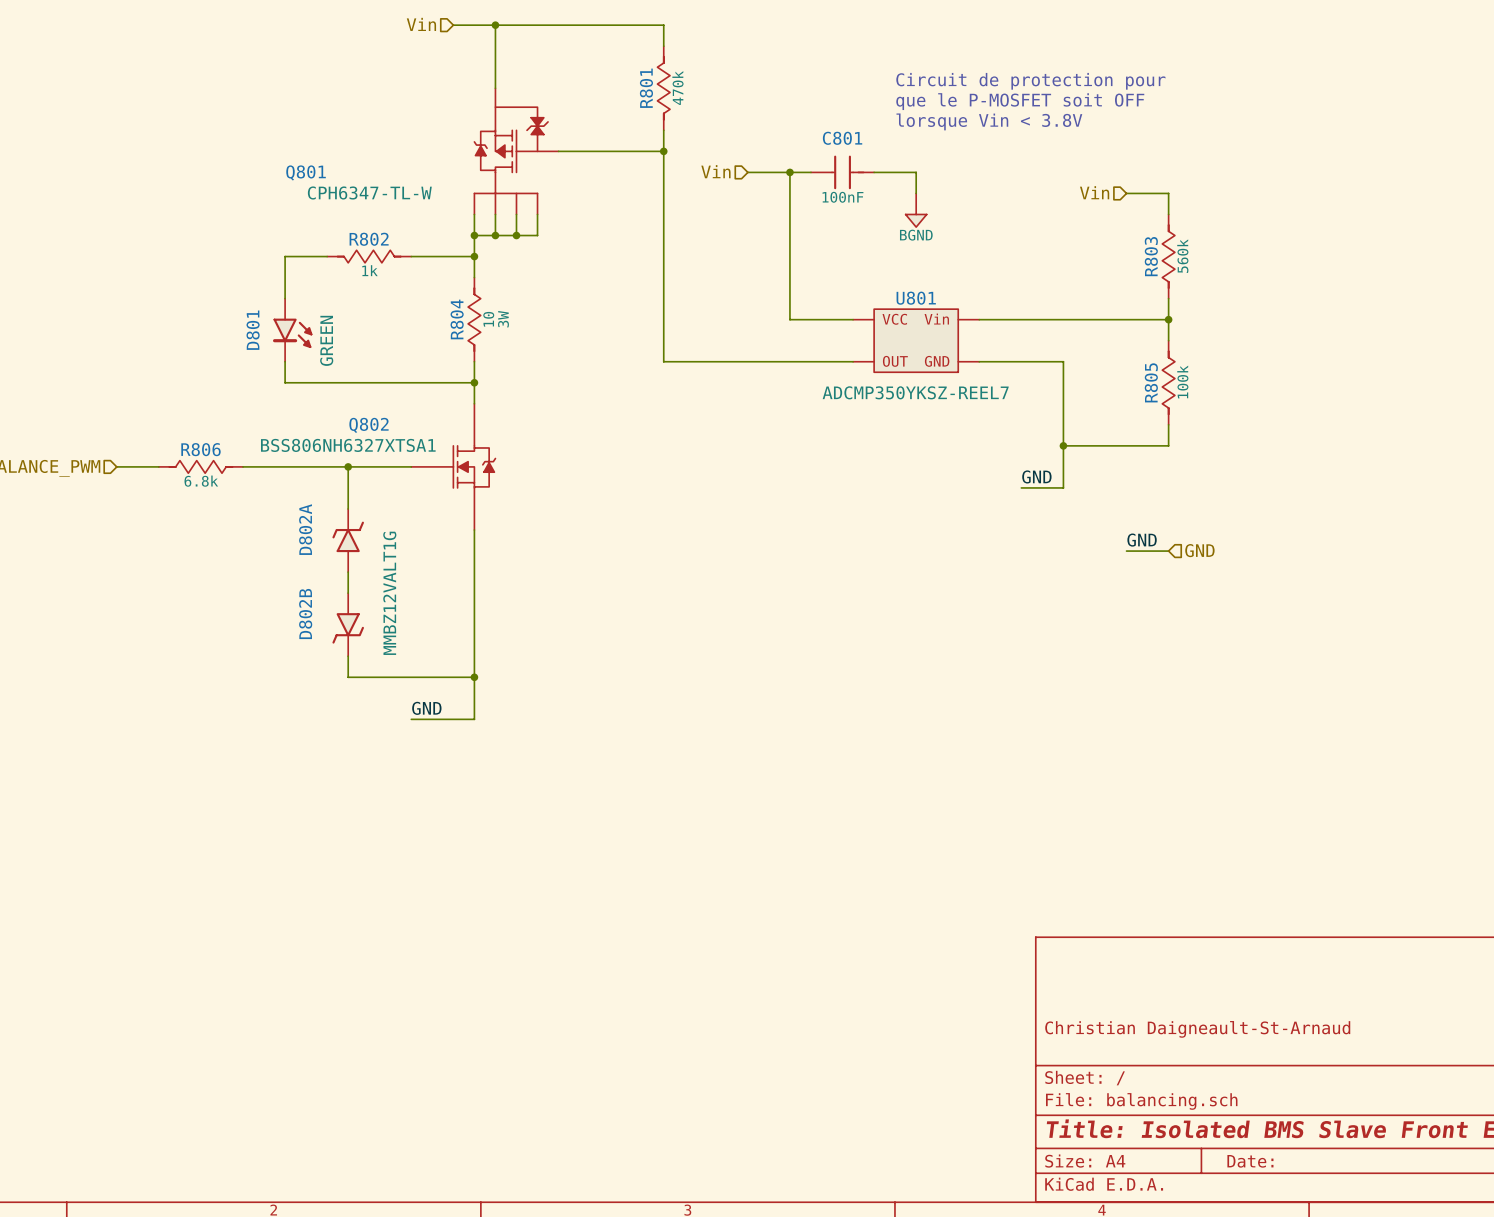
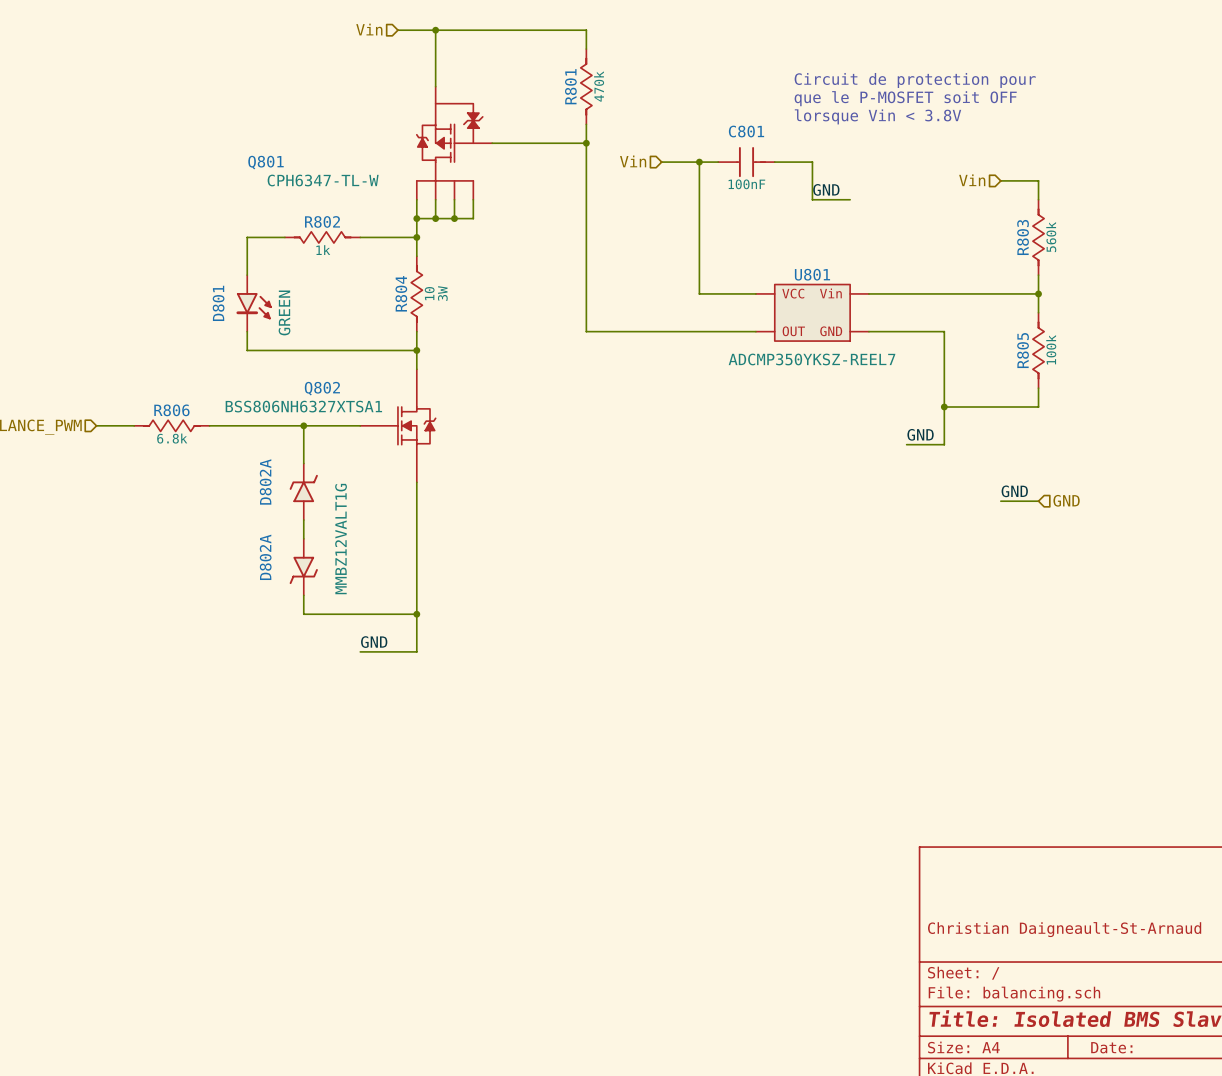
wire: none -> (812, 180) (812, 199) (850, 199)
label: none -> GND (826, 189)
power symbol: BGND (916, 210) -> none
D802B name: D802B (305, 614) -> D802A (265, 557)

